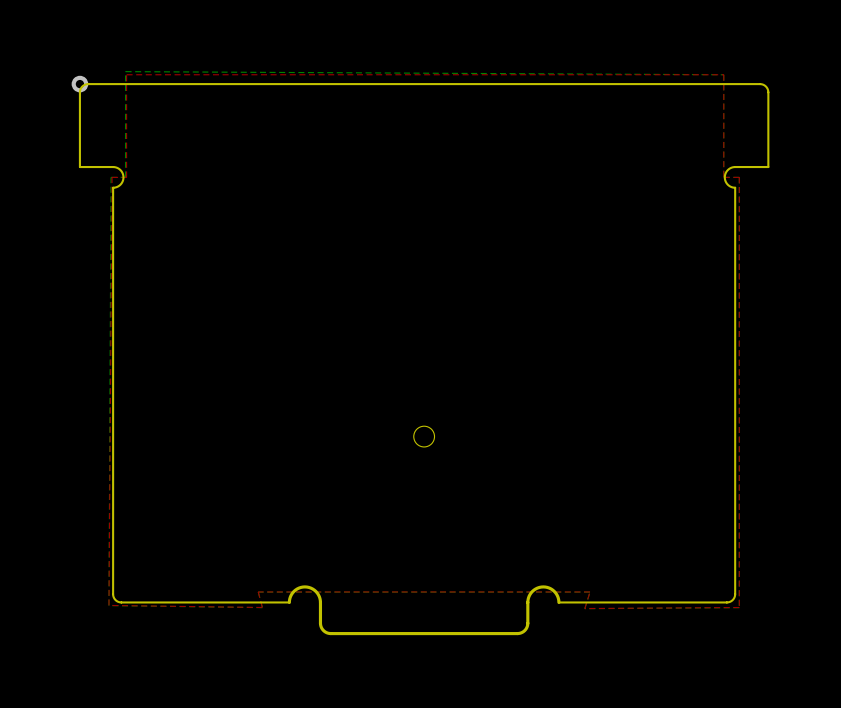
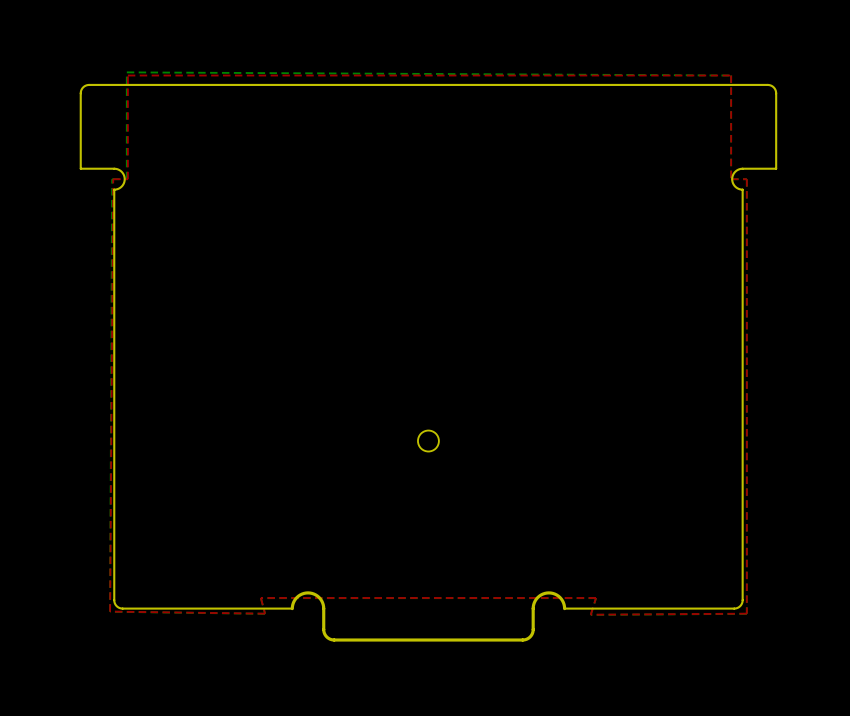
via: (79, 84) -> none

